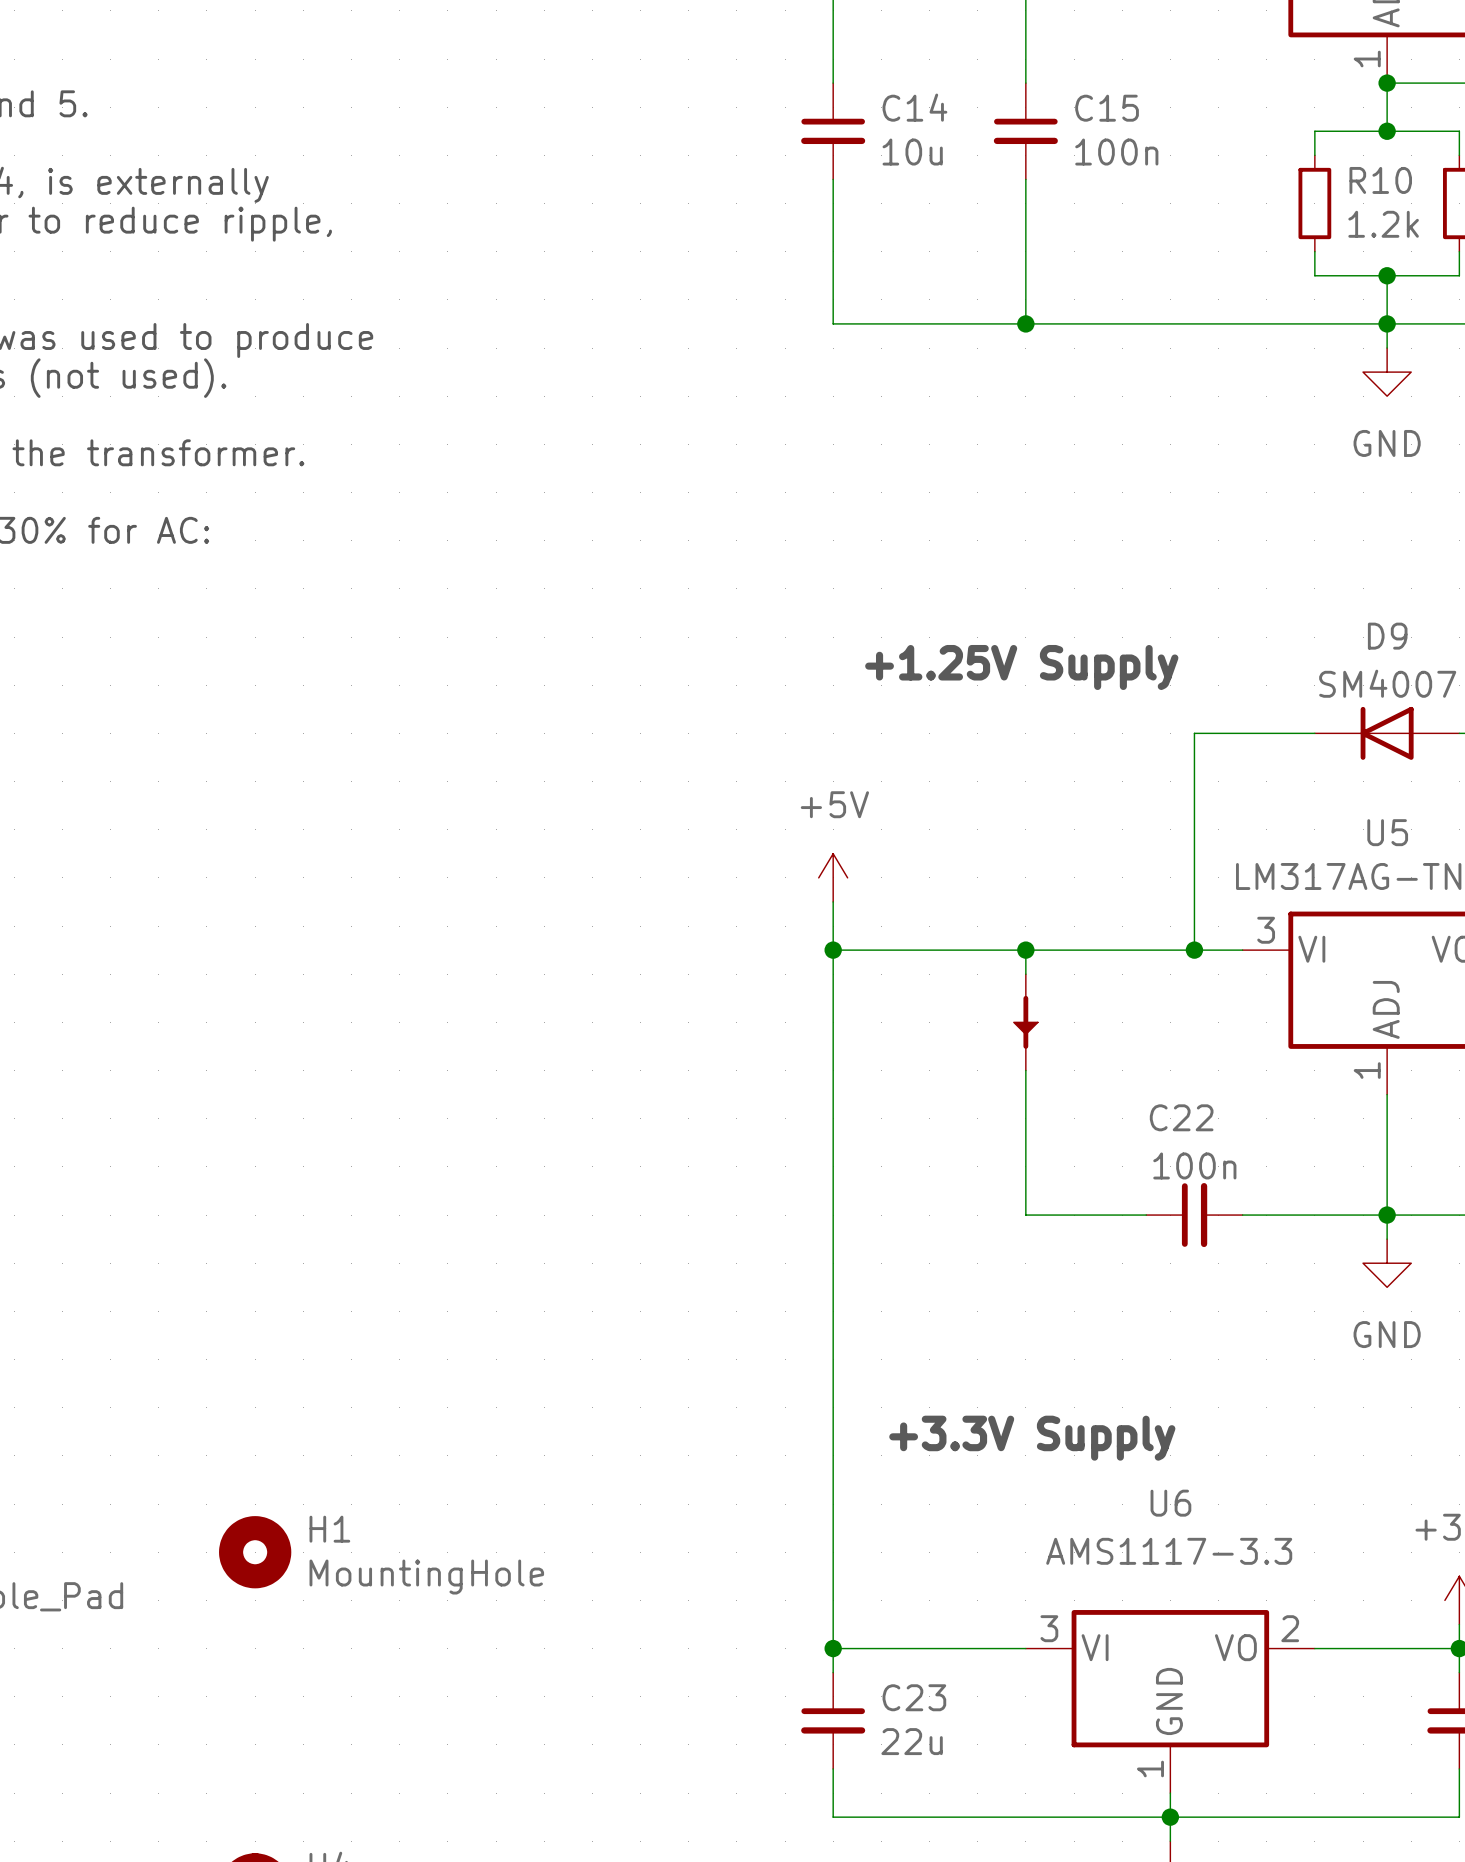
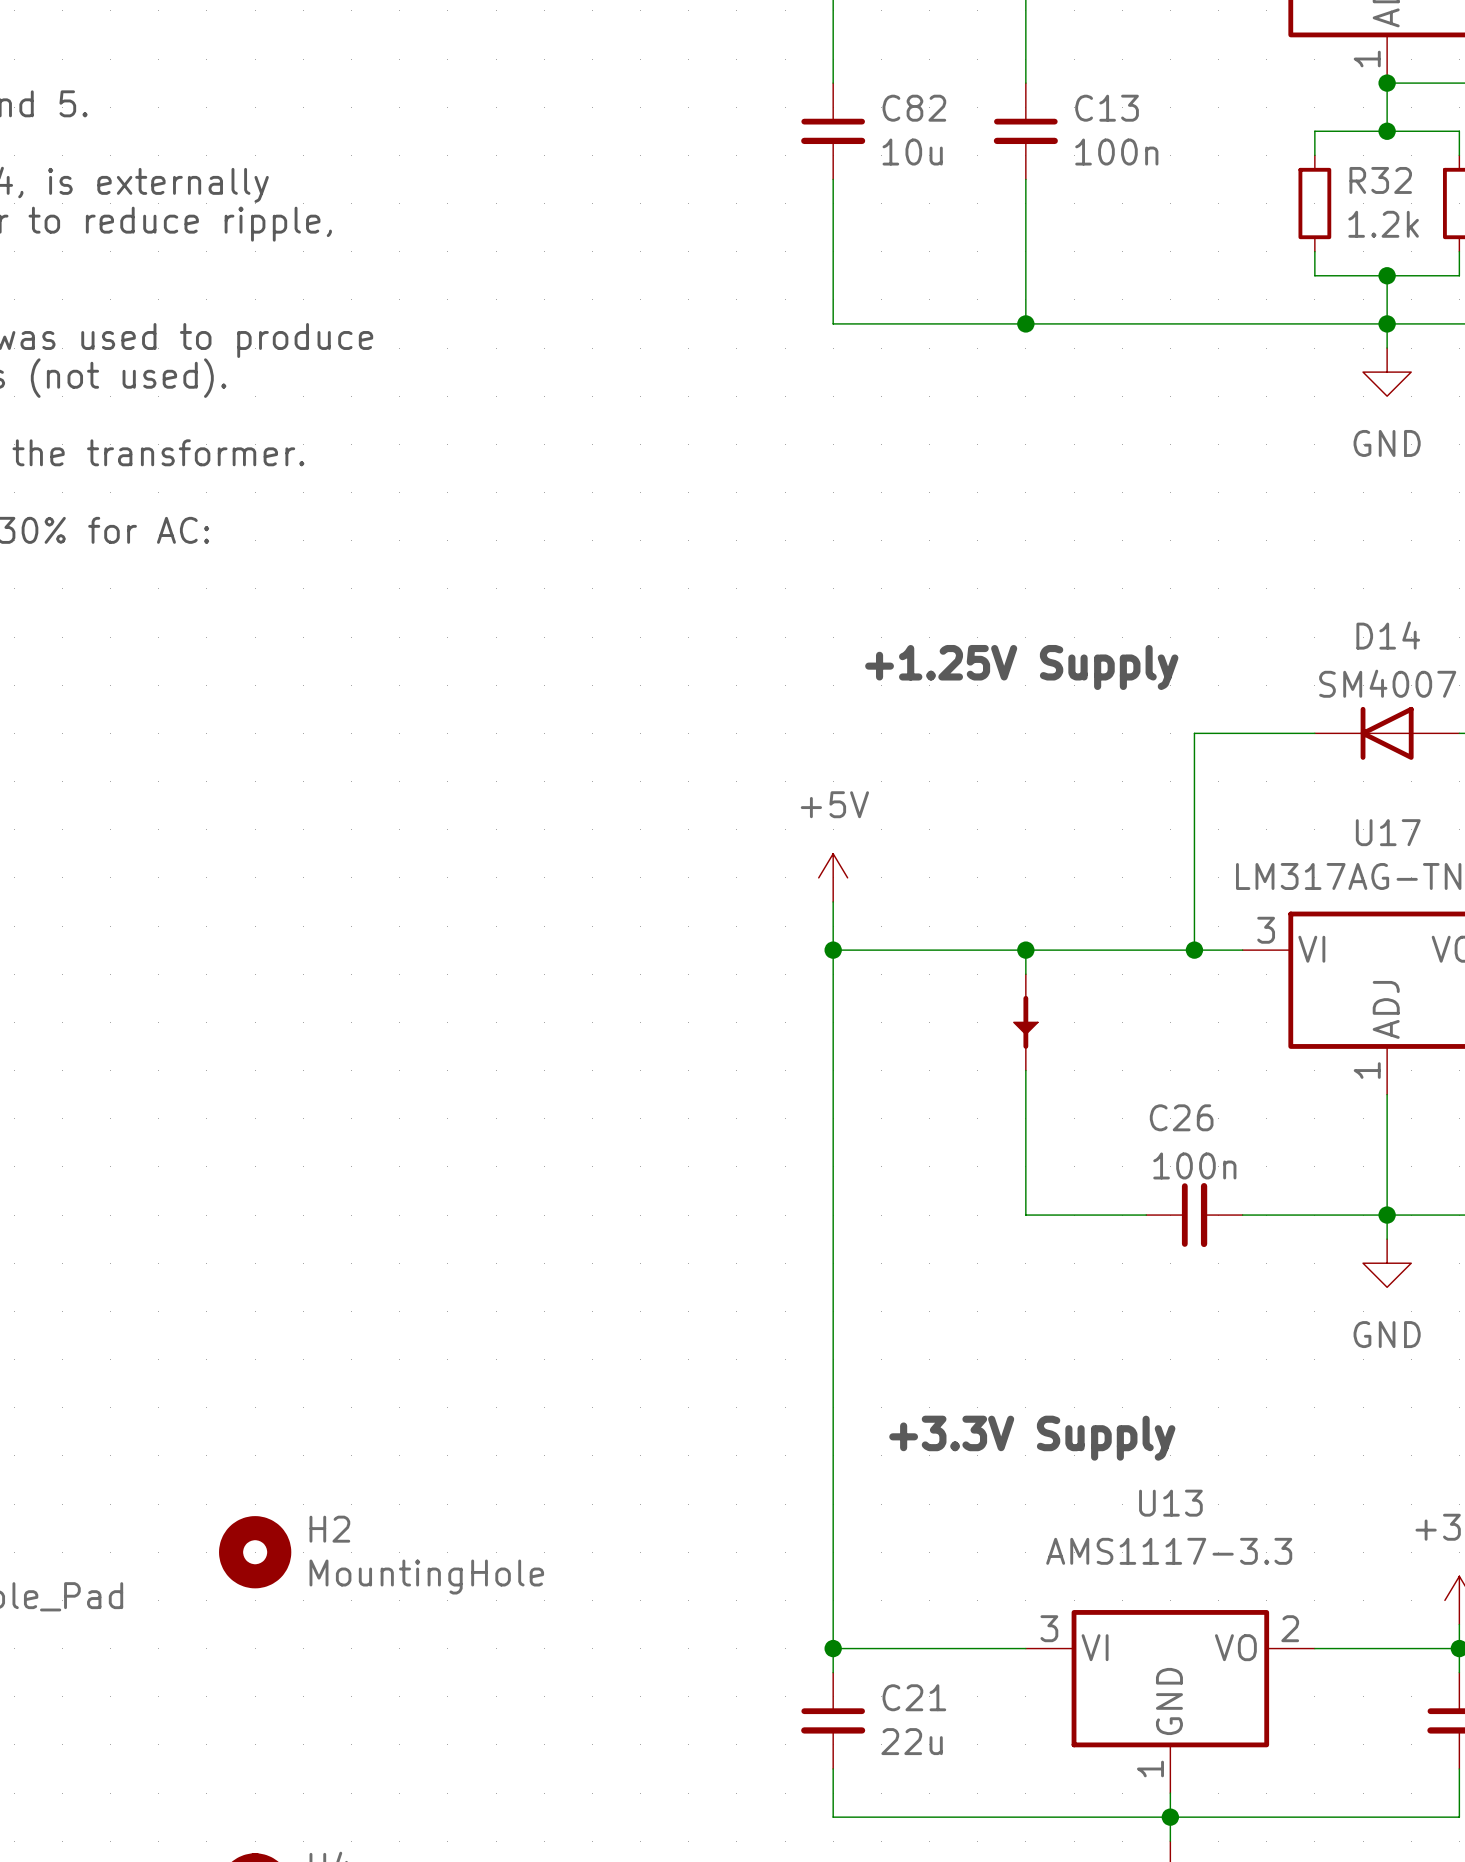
C14 name: C14 (914, 107) -> C82 (914, 108)
C15 name: C15 (1107, 108) -> C13 (1107, 108)
R10 name: R10 (1380, 180) -> R32 (1380, 180)
D9 name: D9 (1387, 636) -> D14 (1388, 635)
U5 name: U5 (1387, 832) -> U17 (1388, 832)
C22 name: C22 (1181, 1117) -> C26 (1181, 1117)
U6 name: U6 (1170, 1503) -> U13 (1170, 1503)
H1 name: H1 (329, 1529) -> H2 (329, 1529)
C23 name: C23 (914, 1697) -> C21 (914, 1697)

